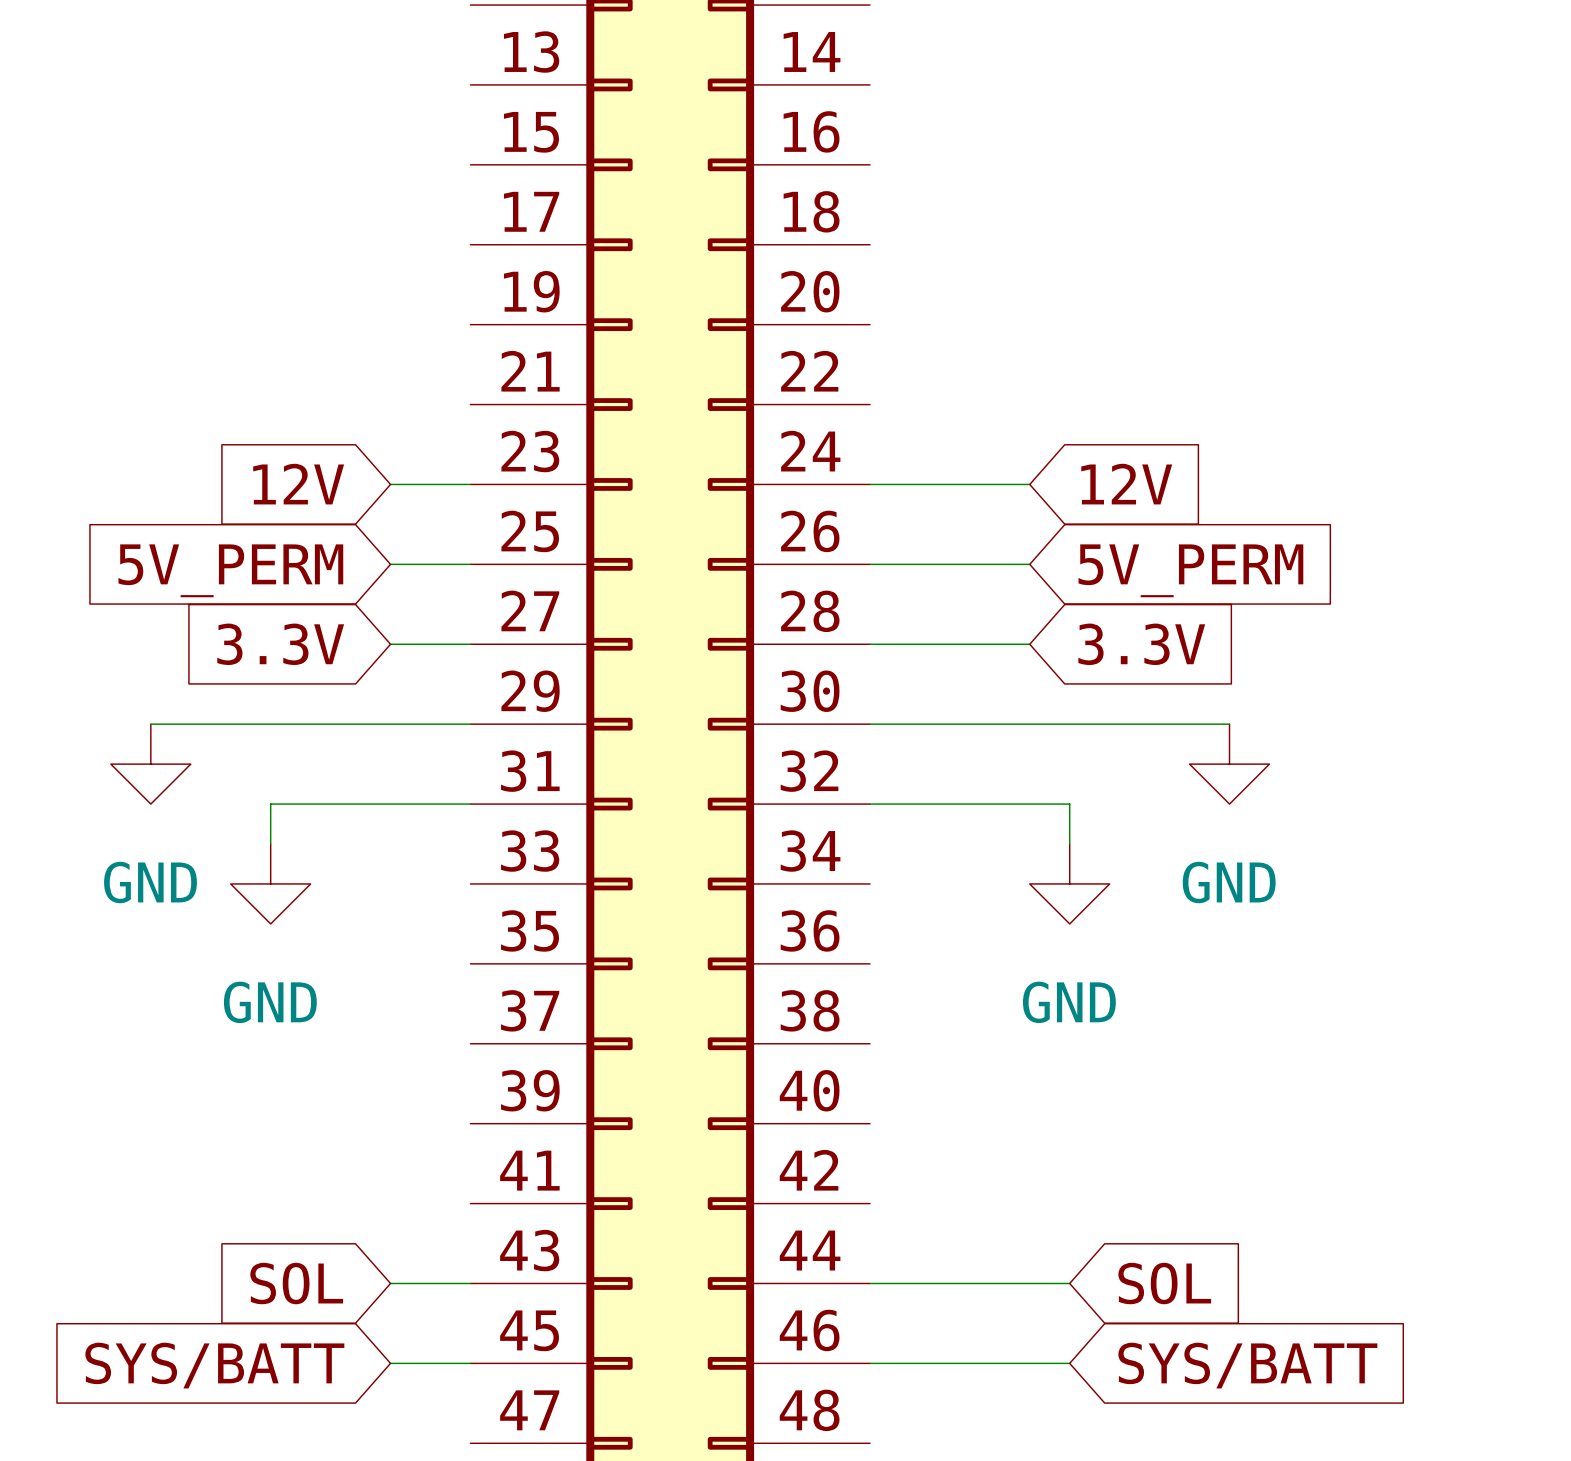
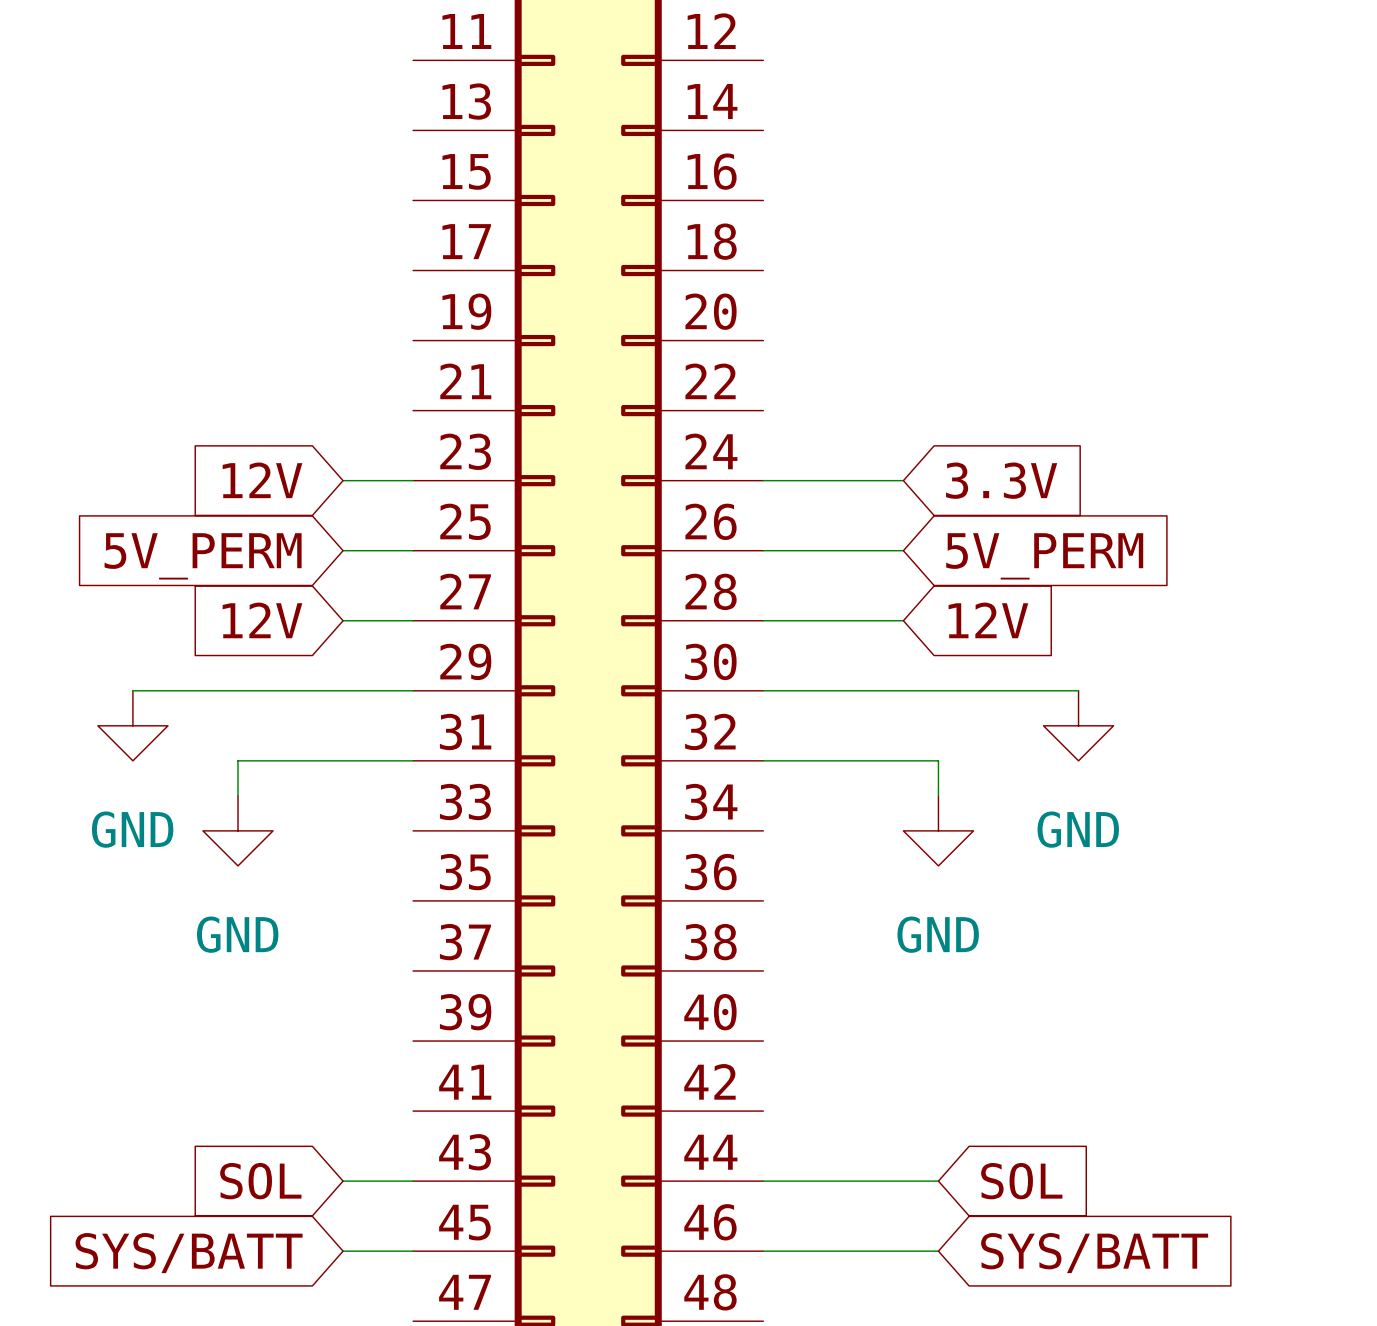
global label: 12V (1126, 484) -> 3.3V (1001, 480)
global label: 3.3V (280, 644) -> 12V (262, 620)
global label: 3.3V (1141, 644) -> 12V (988, 620)

